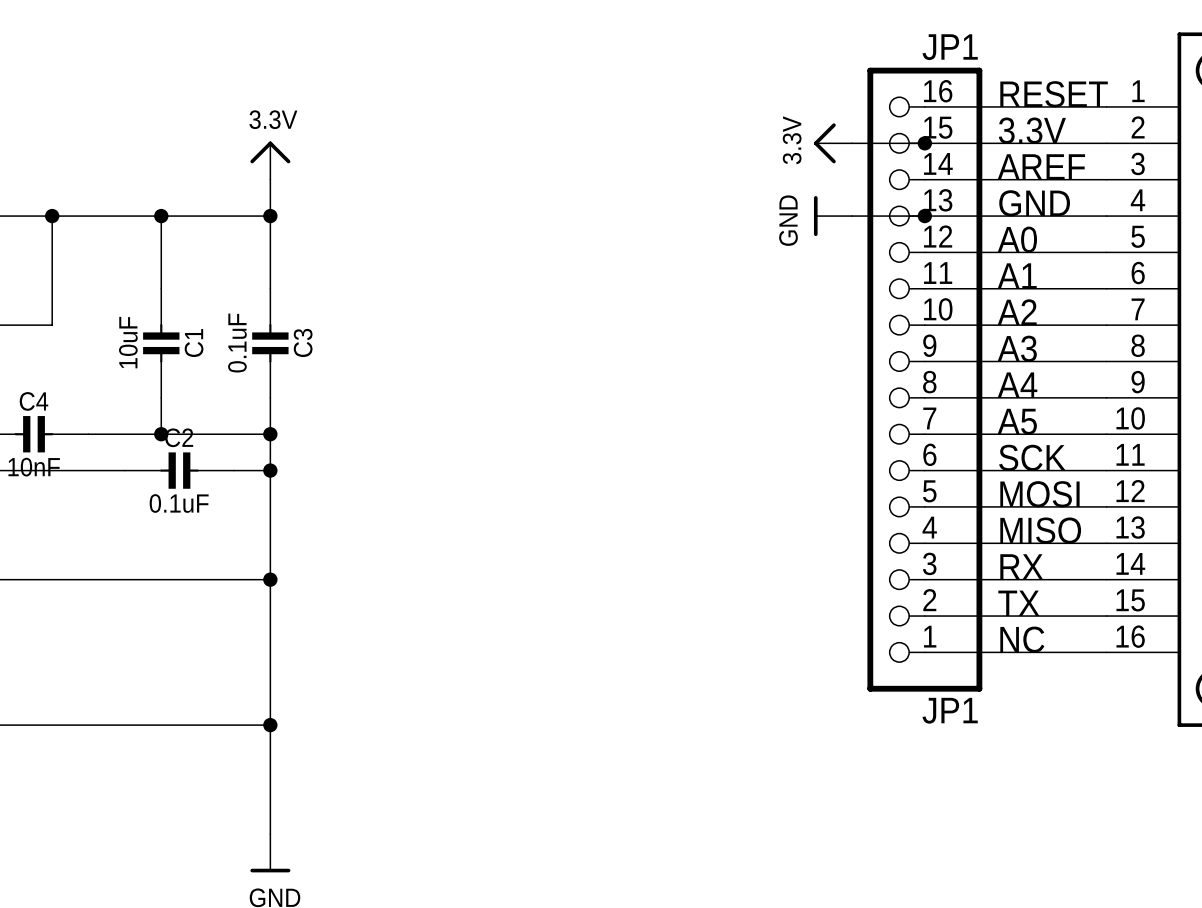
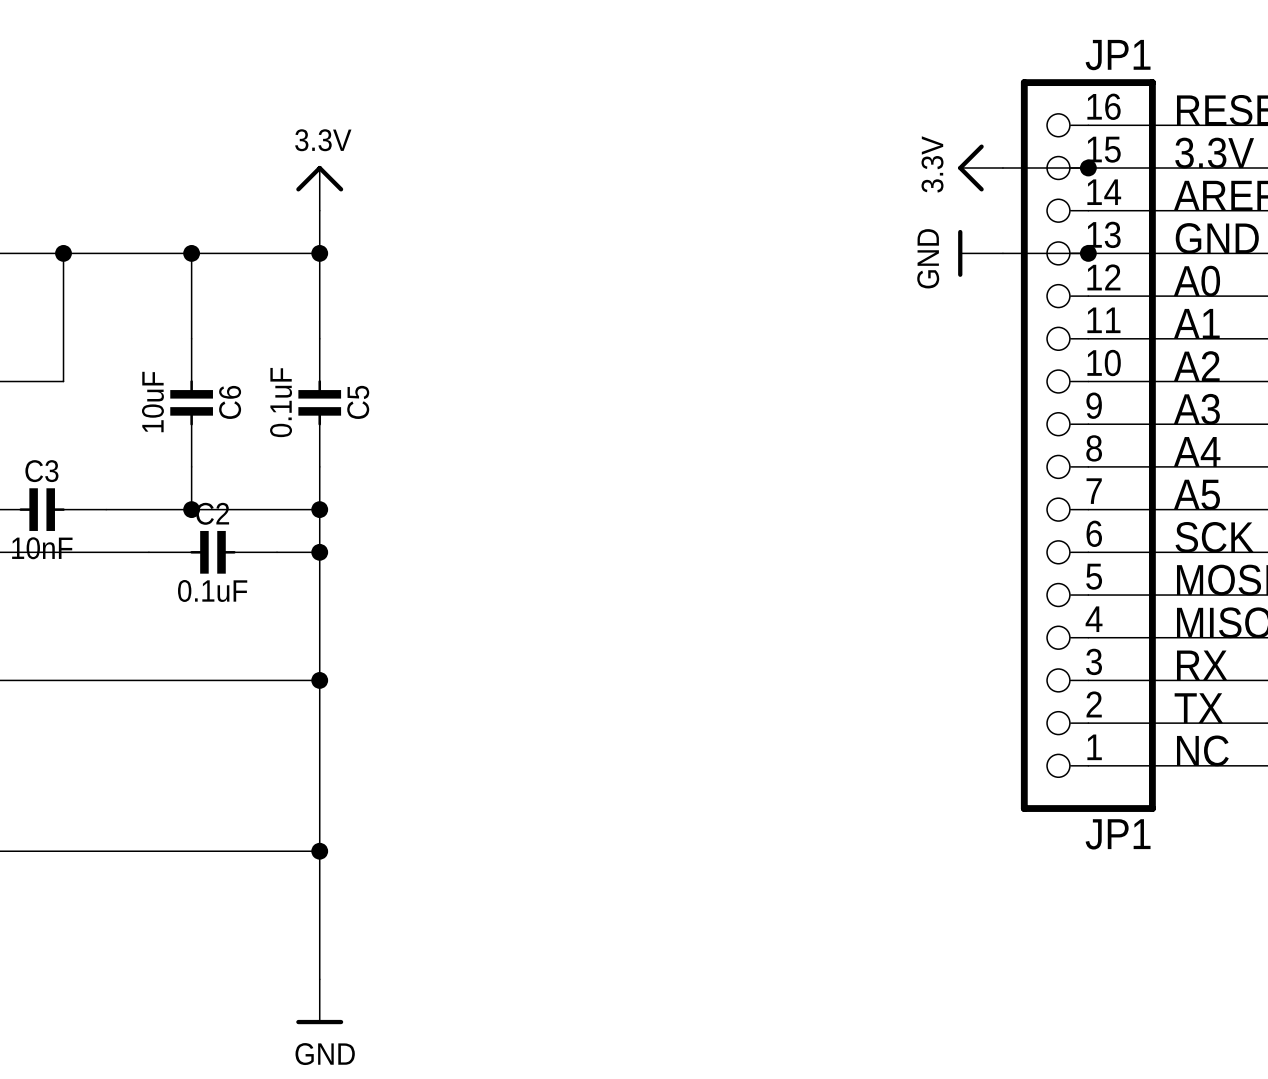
C3 name: C3 (303, 342) -> C5 (358, 402)
C1 name: C1 (194, 343) -> C6 (230, 402)
C4 name: C4 (33, 401) -> C3 (41, 471)

